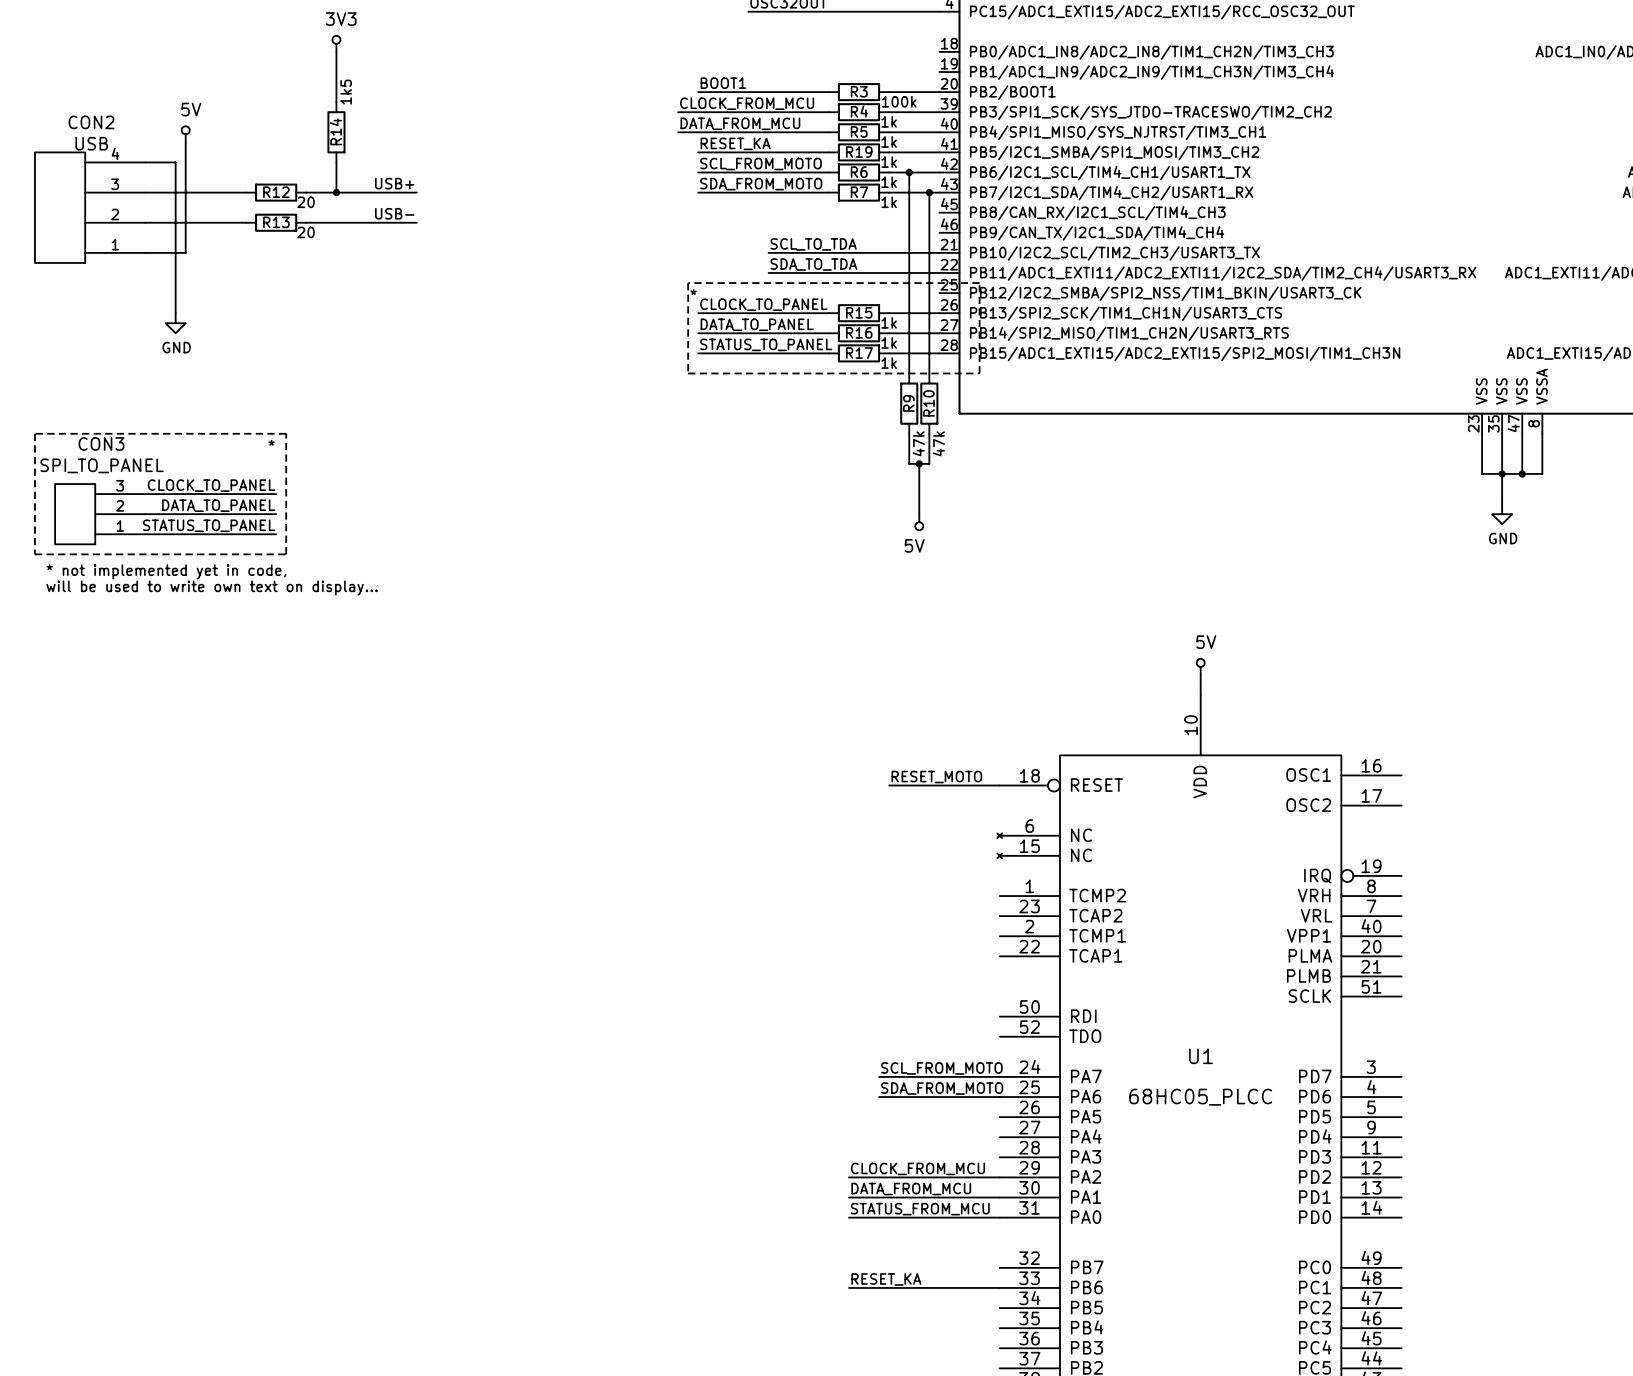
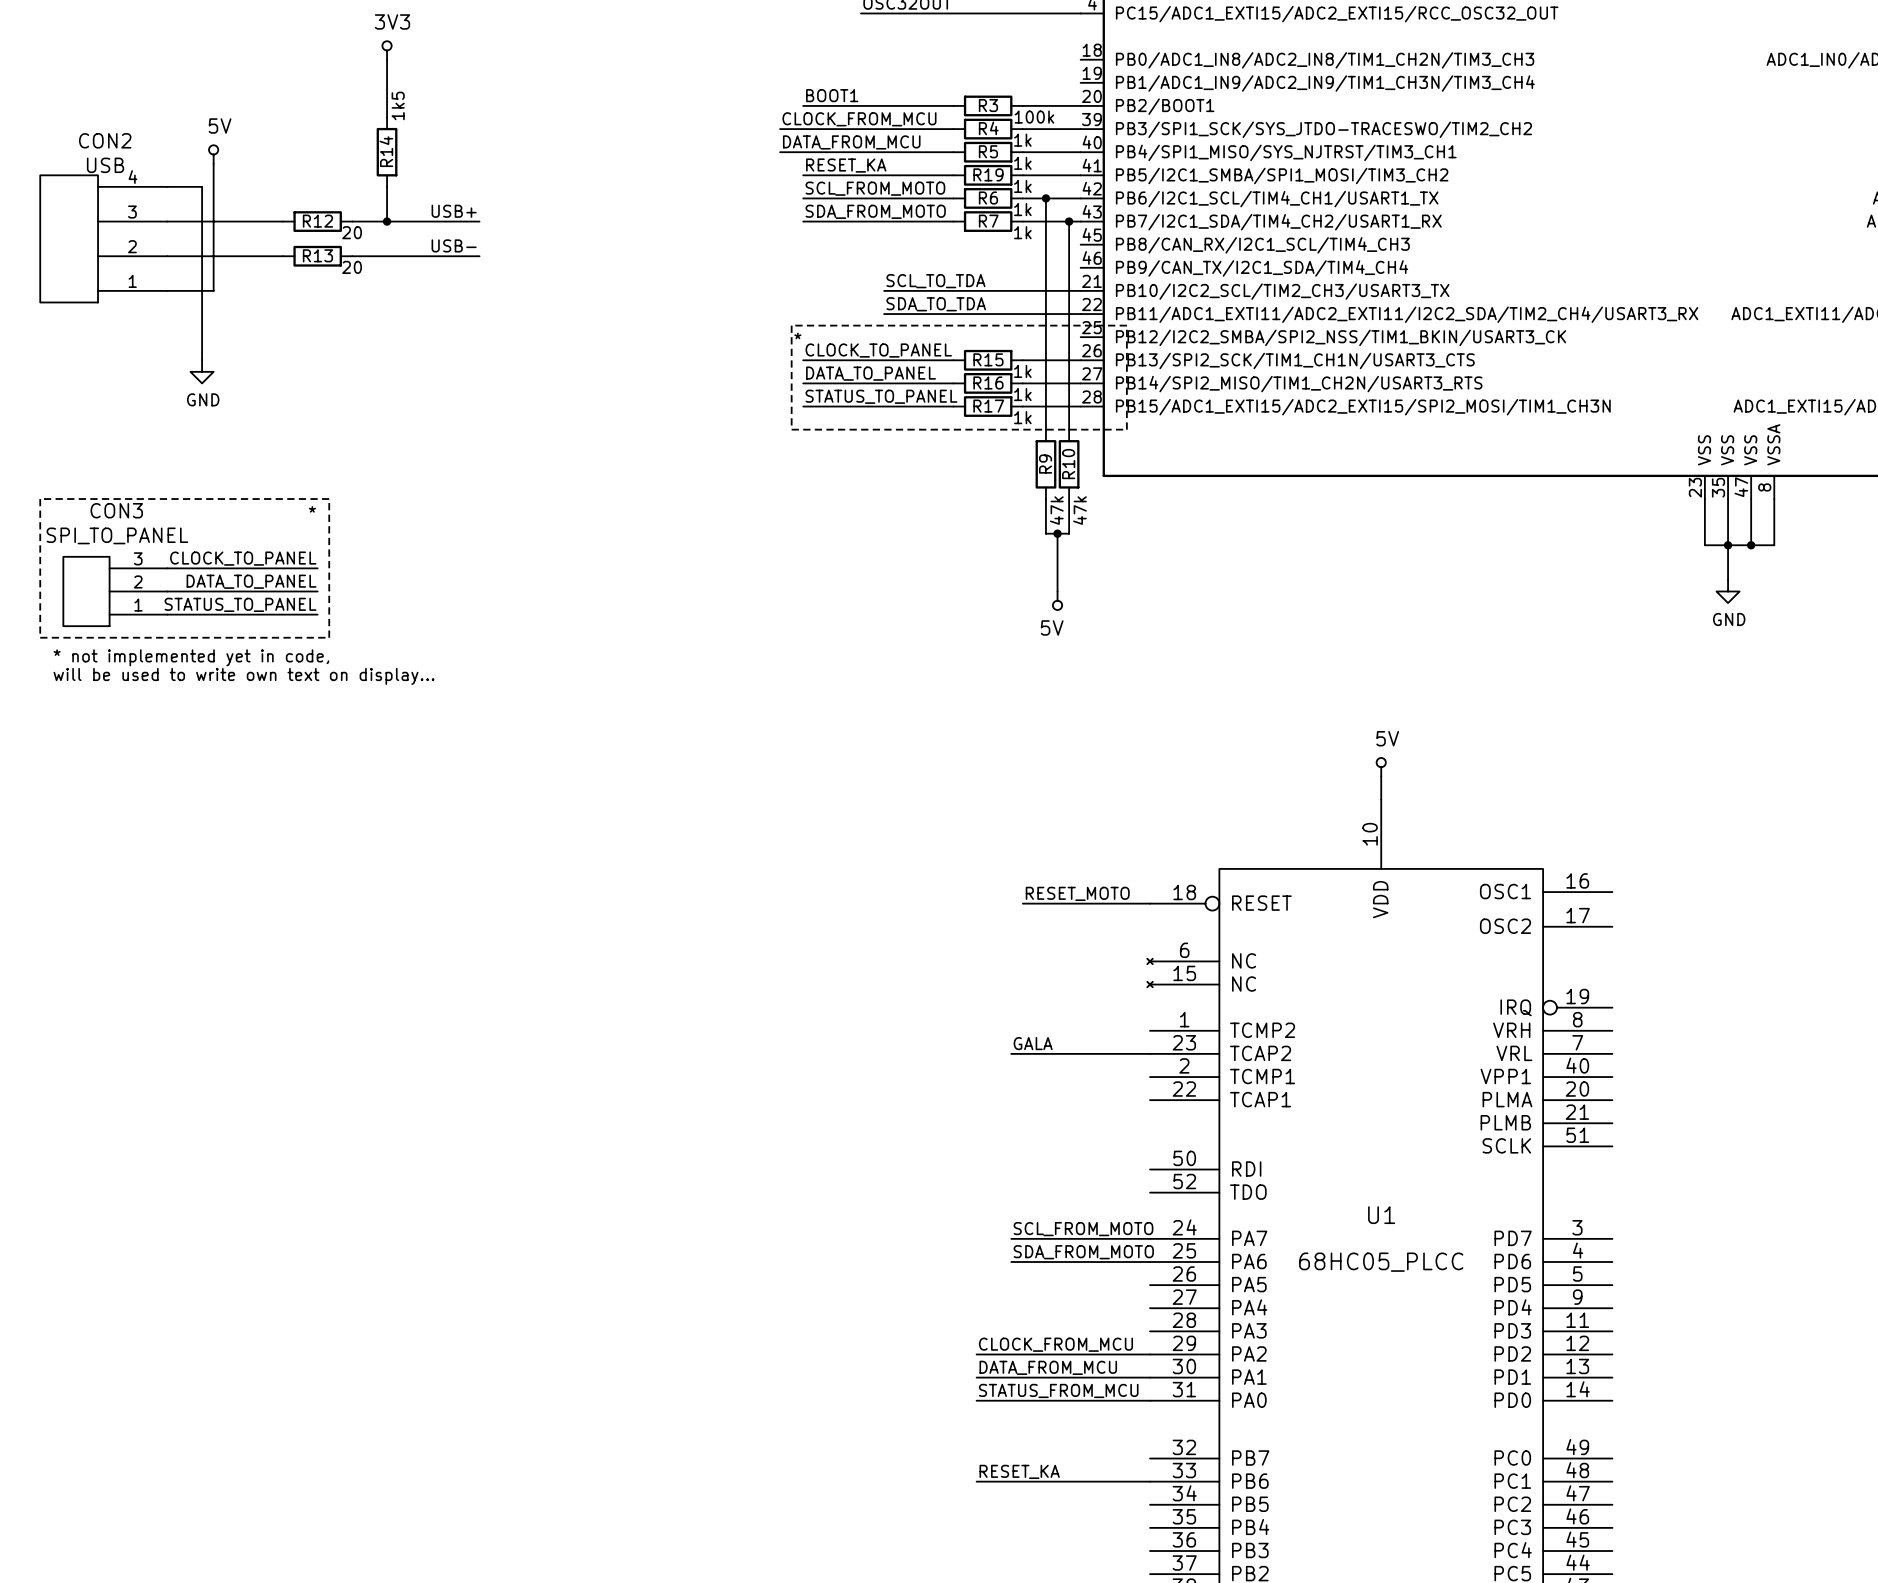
label: none -> GALA (1033, 1043)
wire: none -> (1011, 1053) (1150, 1053)

